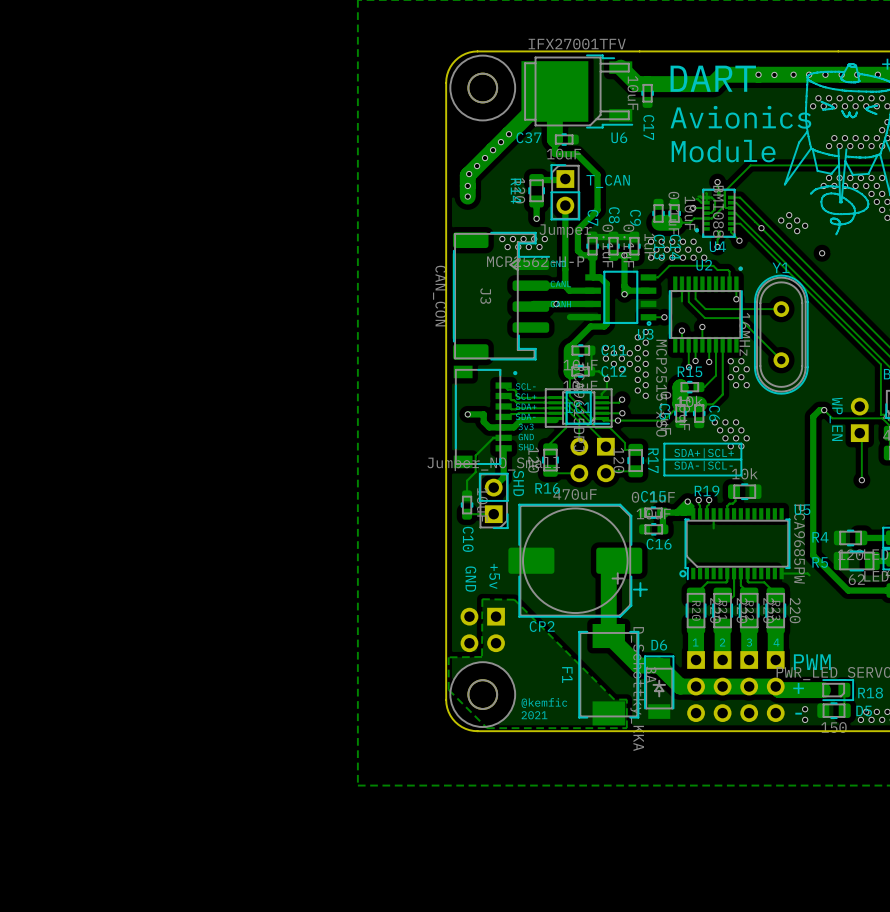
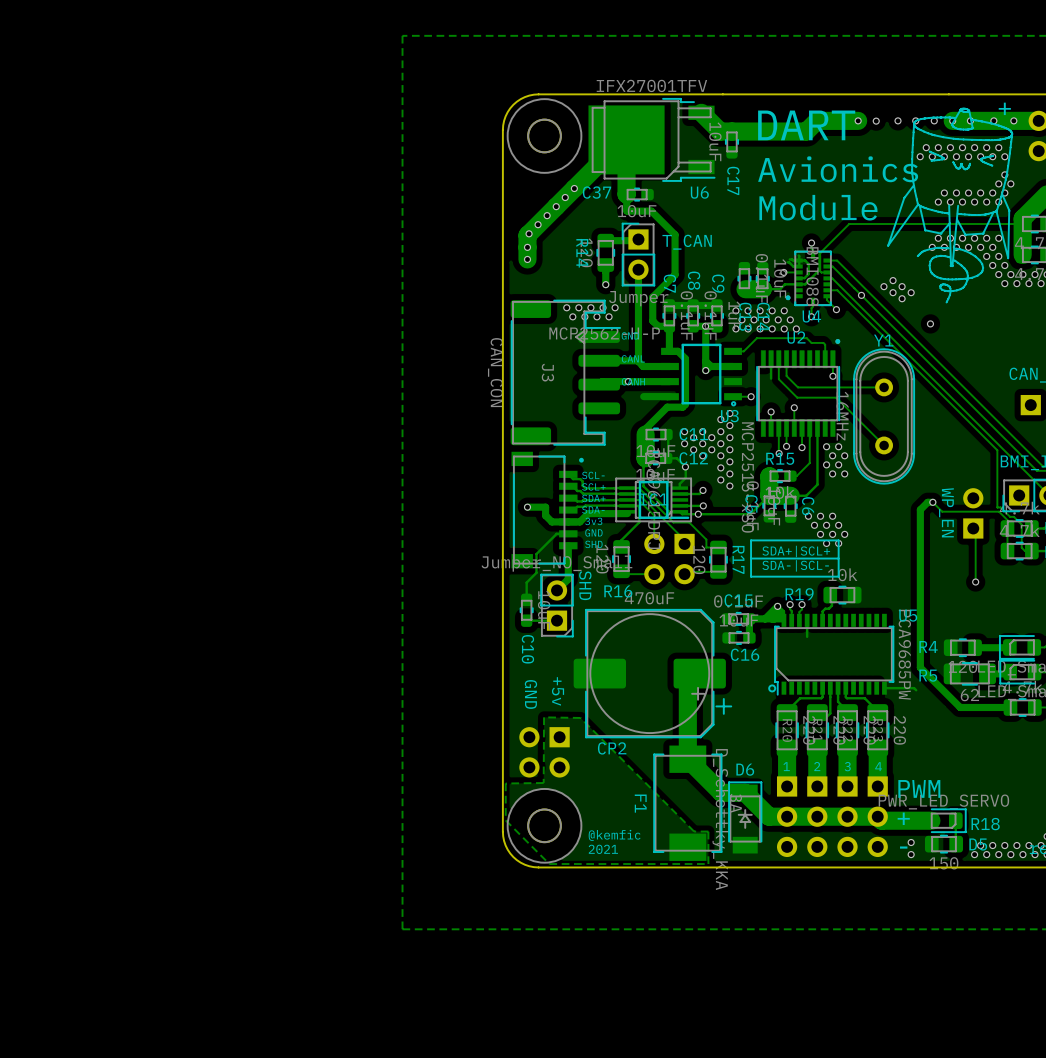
track: (841, 74) (758, 74) -> none

